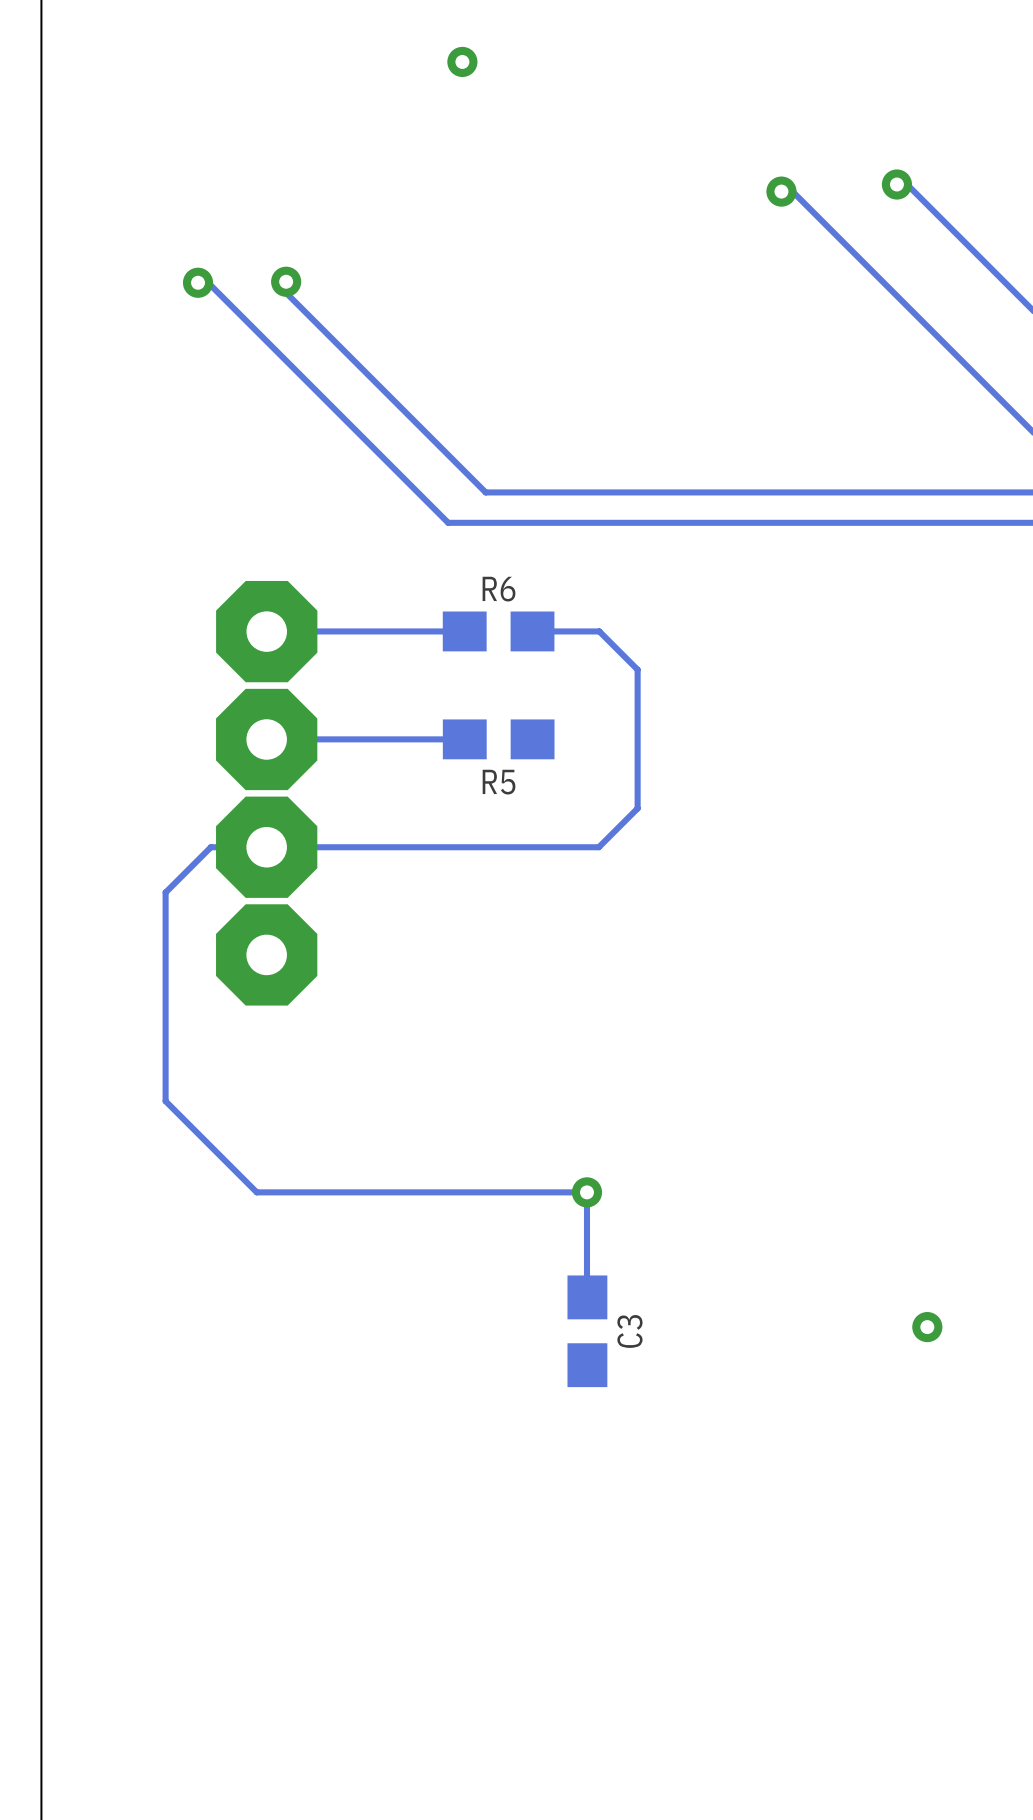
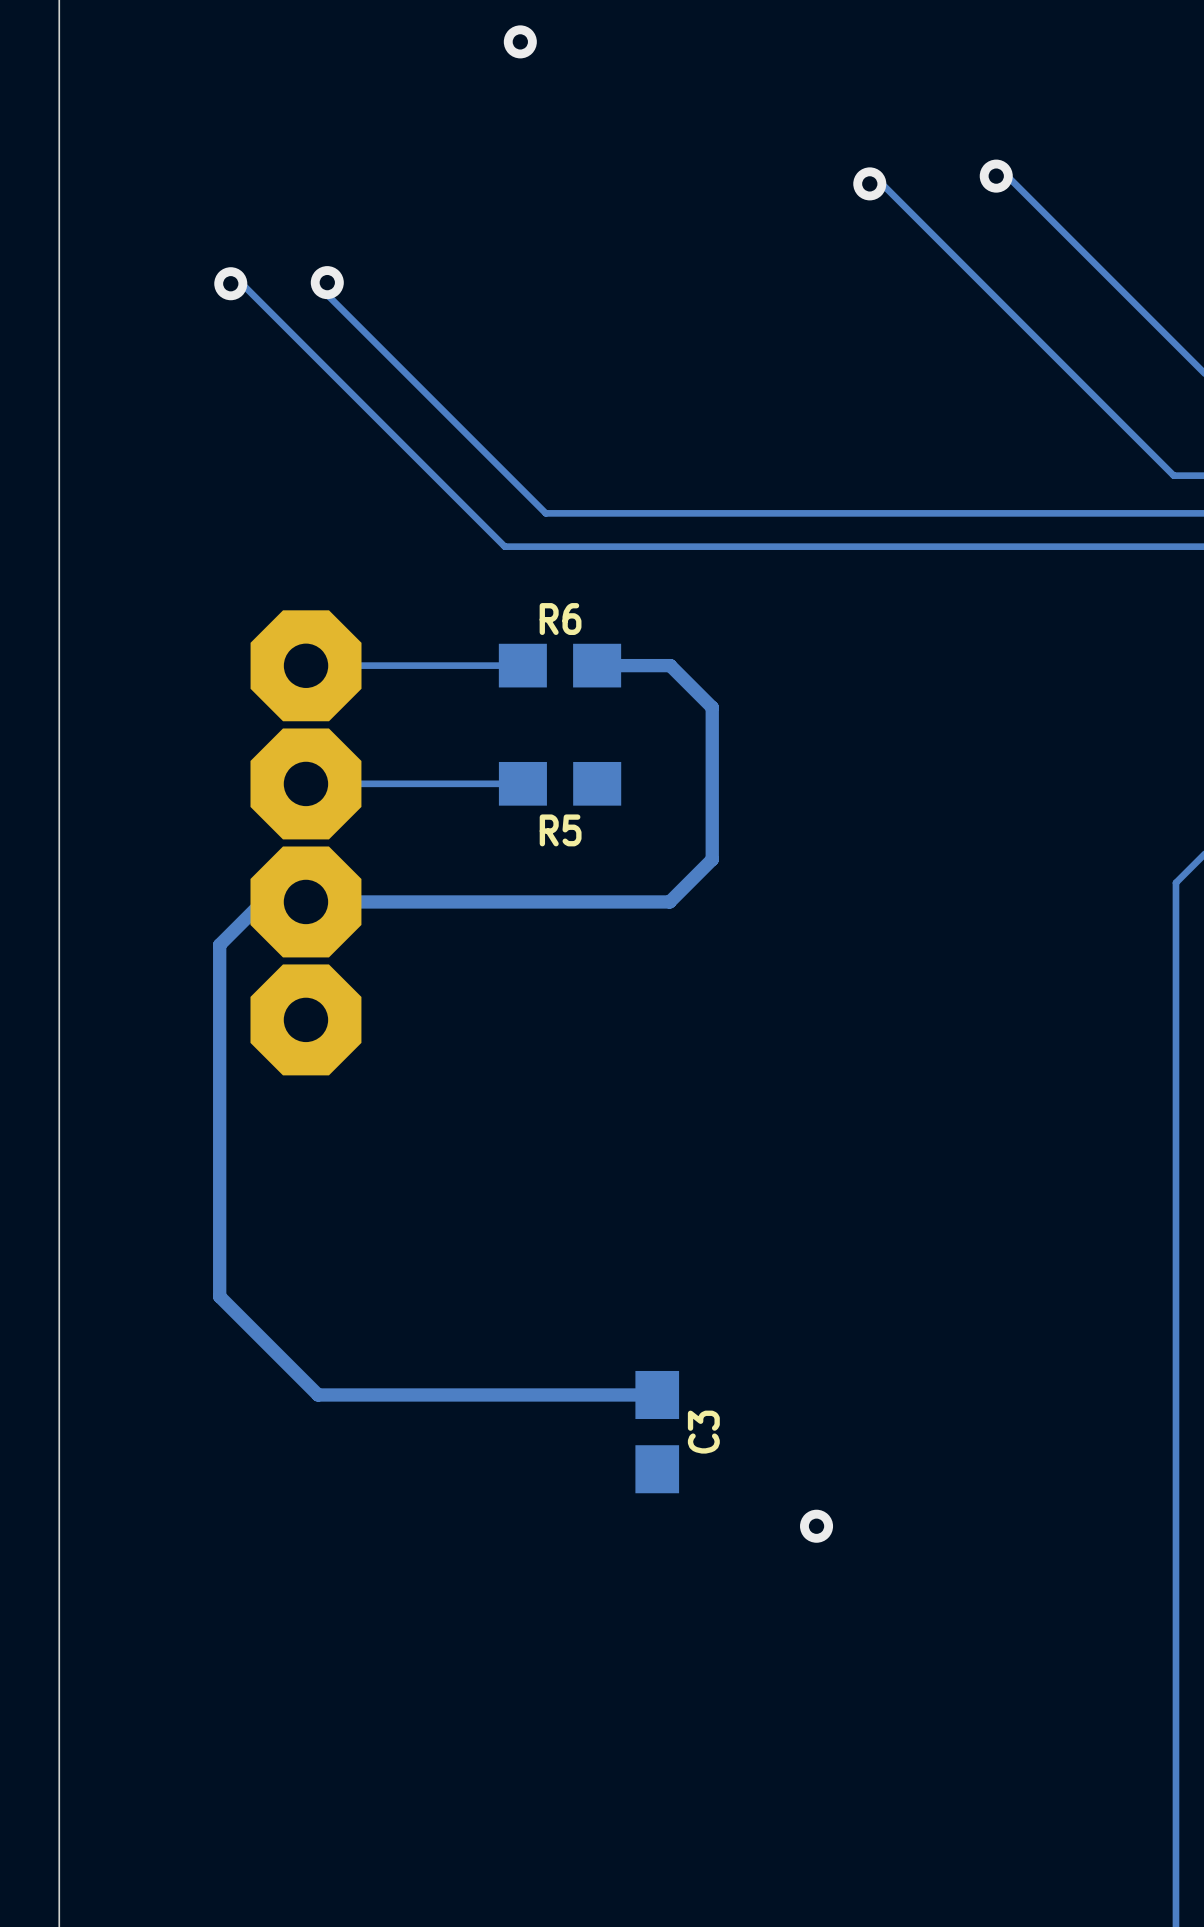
track width: thin (532, 631) (599, 631) (637, 669) (637, 808) (598, 847) (227, 847) -> thick (597, 665) (670, 665) (712, 707) (712, 859) (669, 901) (262, 901)
track: (227, 847) (210, 847) (165, 892) (165, 1101) (256, 1192) (586, 1192) (586, 1296) -> (262, 901) (219, 944) (219, 1296) (318, 1394) (657, 1394)
via: (586, 1192) -> none
via: (927, 1327) -> none
via: none -> (816, 1526)

